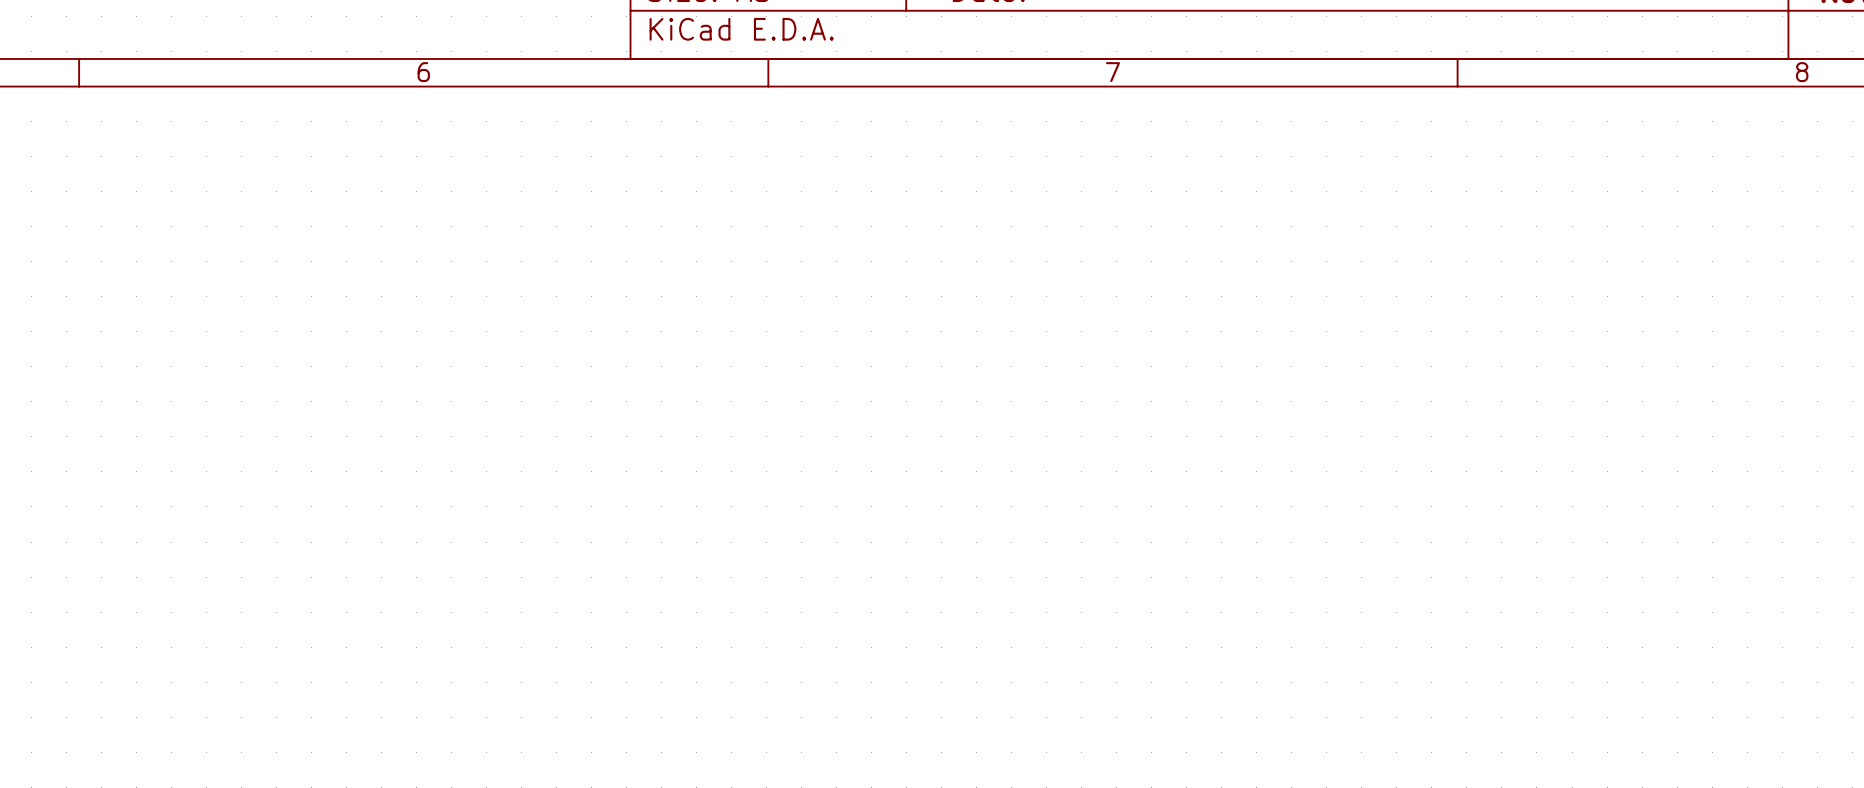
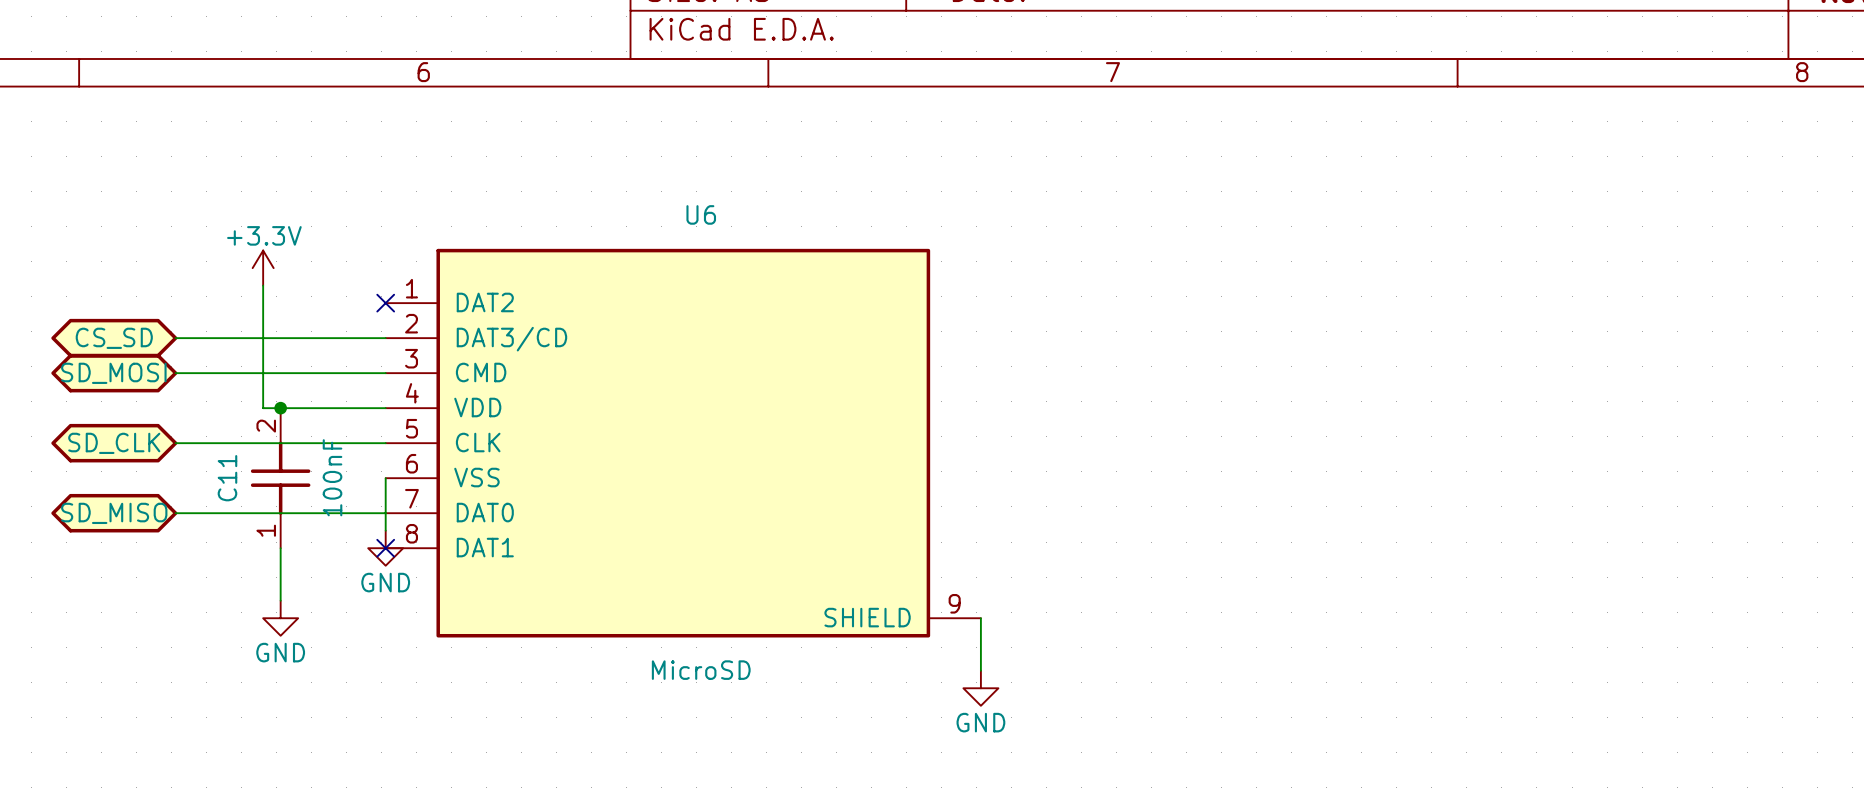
power symbol: none -> +3.3V (263, 268)
wire: none -> (263, 285) (263, 408) (385, 408)
no-connect mark: none -> (385, 303)
power symbol: none -> CS_SD (114, 338)
wire: none -> (175, 338) (385, 338)
power symbol: none -> SD_MOSI (114, 373)
wire: none -> (175, 373) (385, 373)
junction: none -> (280, 408)
power symbol: none -> SD_CLK (114, 443)
wire: none -> (175, 443) (385, 443)
U6: none -> MicroSD (683, 443)
C11: none -> 100nF (280, 478)
wire: none -> (385, 478) (385, 530)
power symbol: none -> SD_MISO (114, 513)
wire: none -> (175, 513) (385, 513)
wire: none -> (280, 548) (280, 600)
no-connect mark: none -> (385, 548)
power symbol: none -> GND (385, 548)
power symbol: none -> GND (280, 618)
wire: none -> (980, 618) (980, 670)
power symbol: none -> GND (980, 688)

